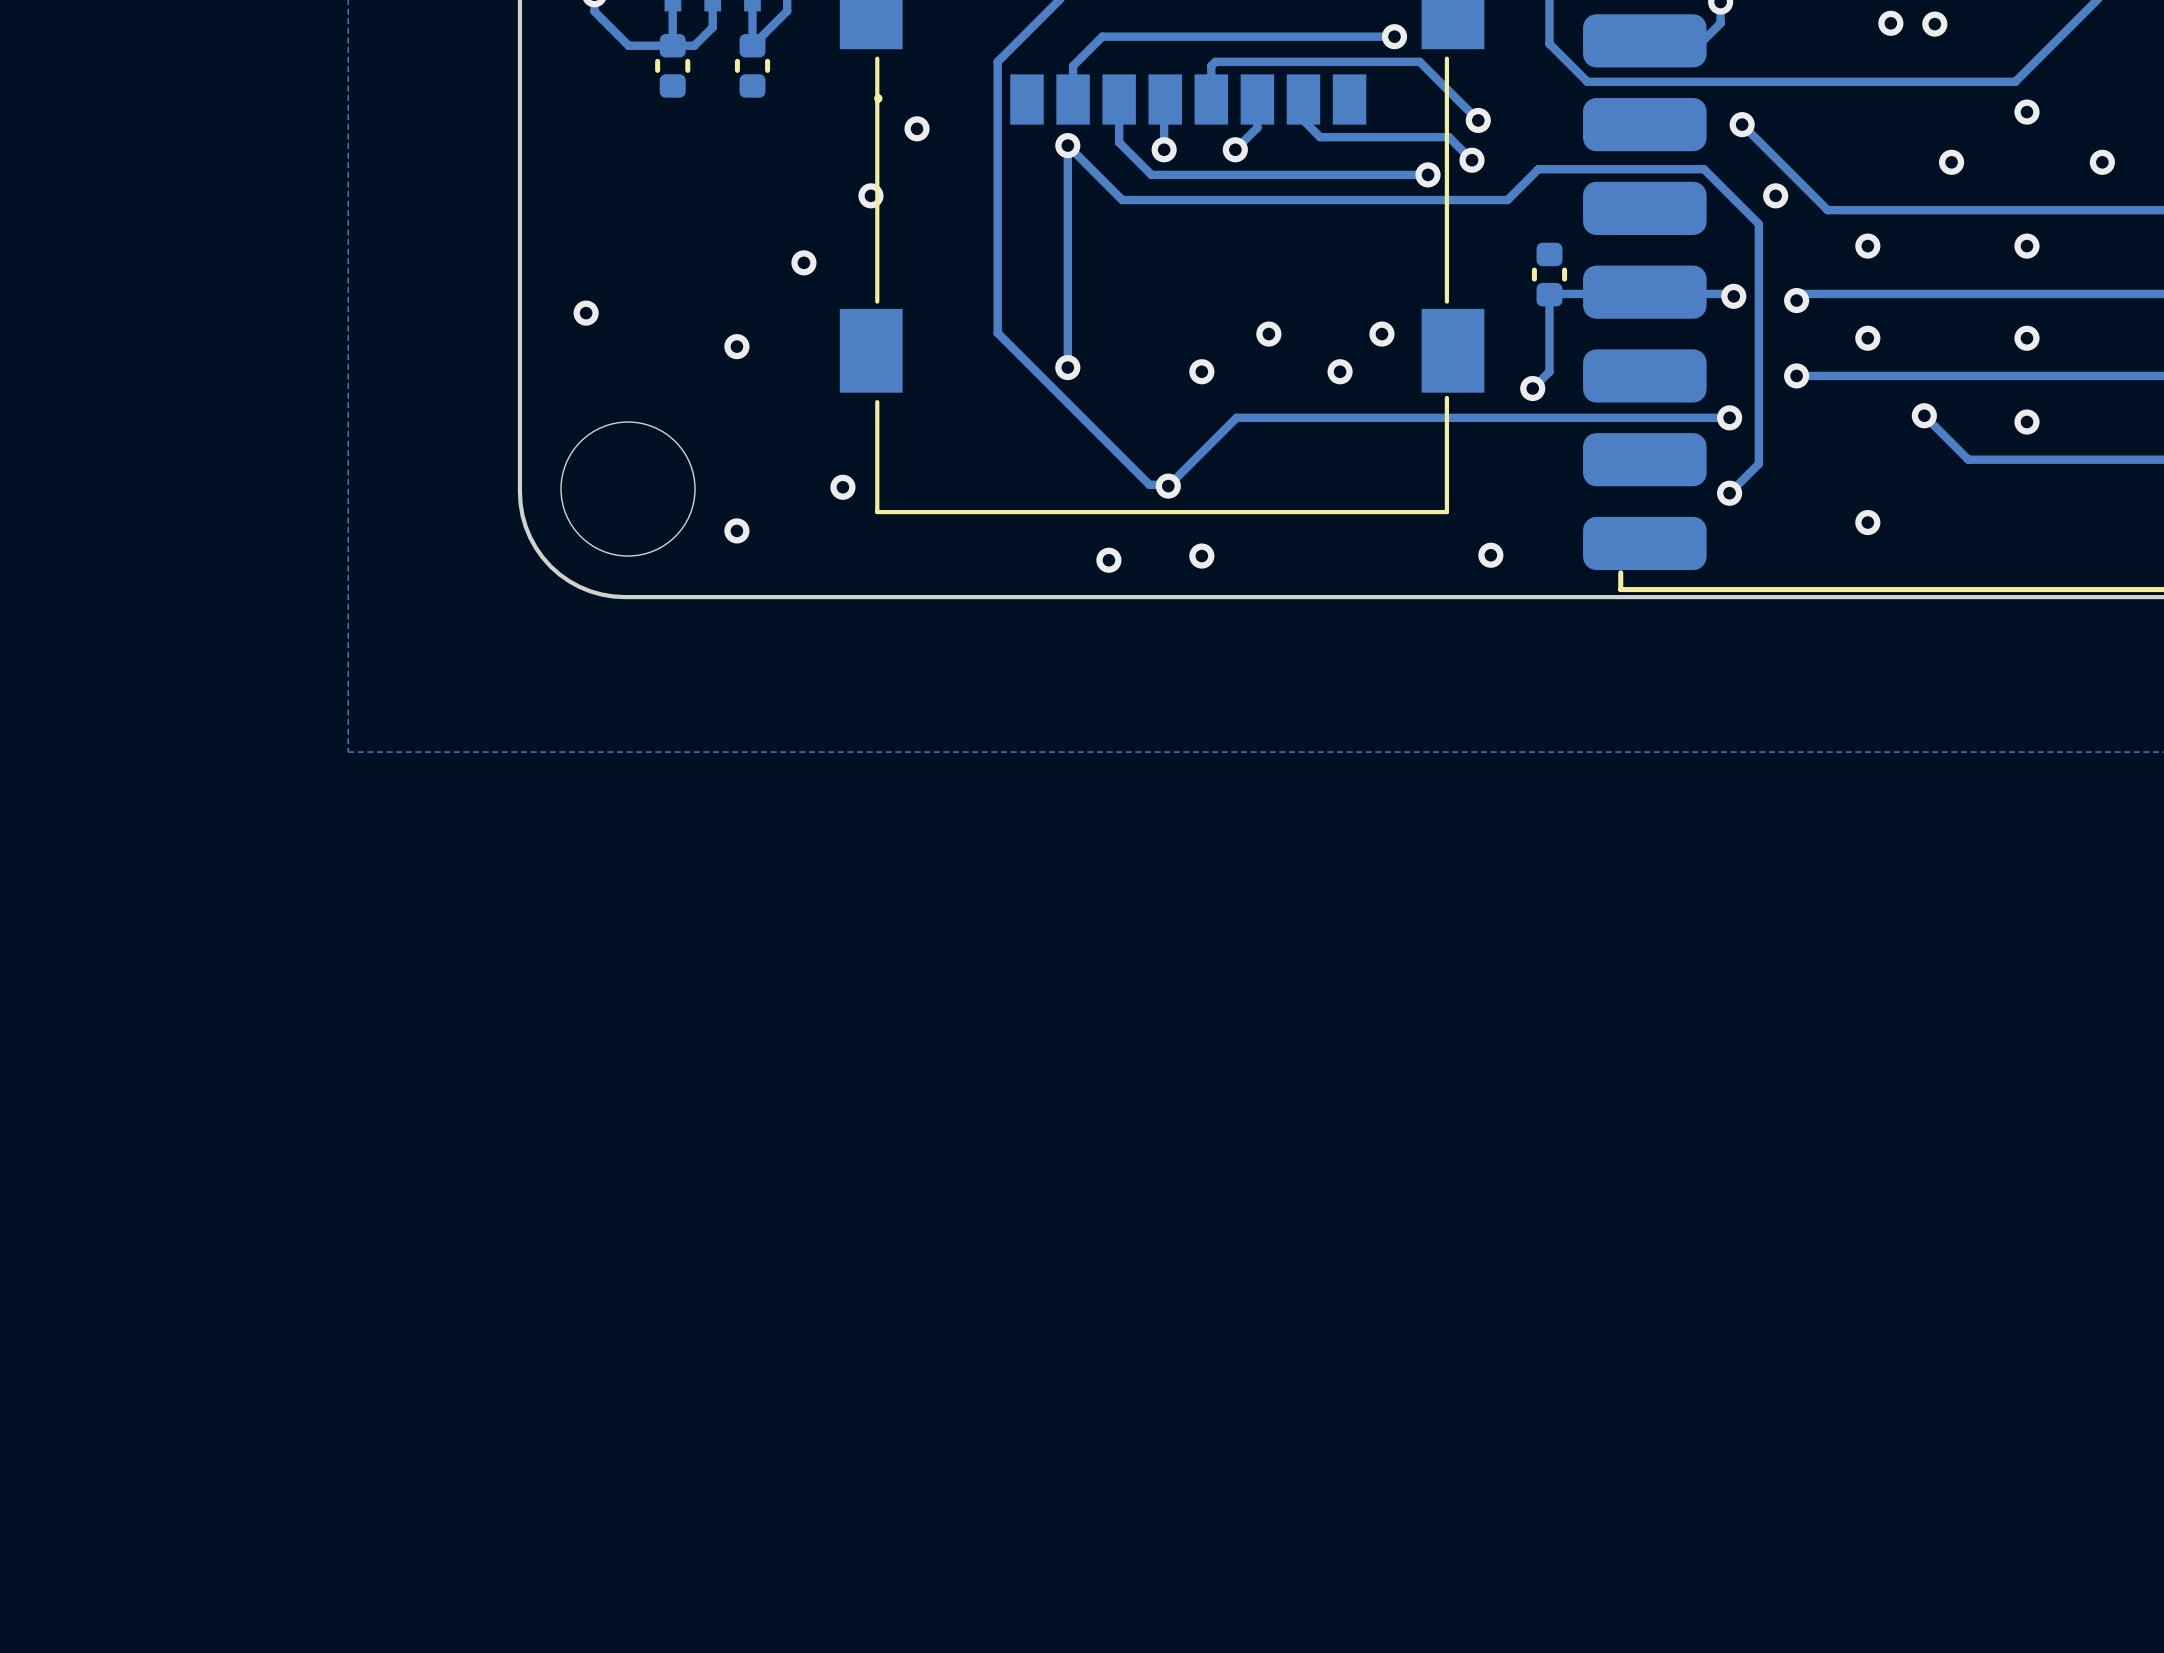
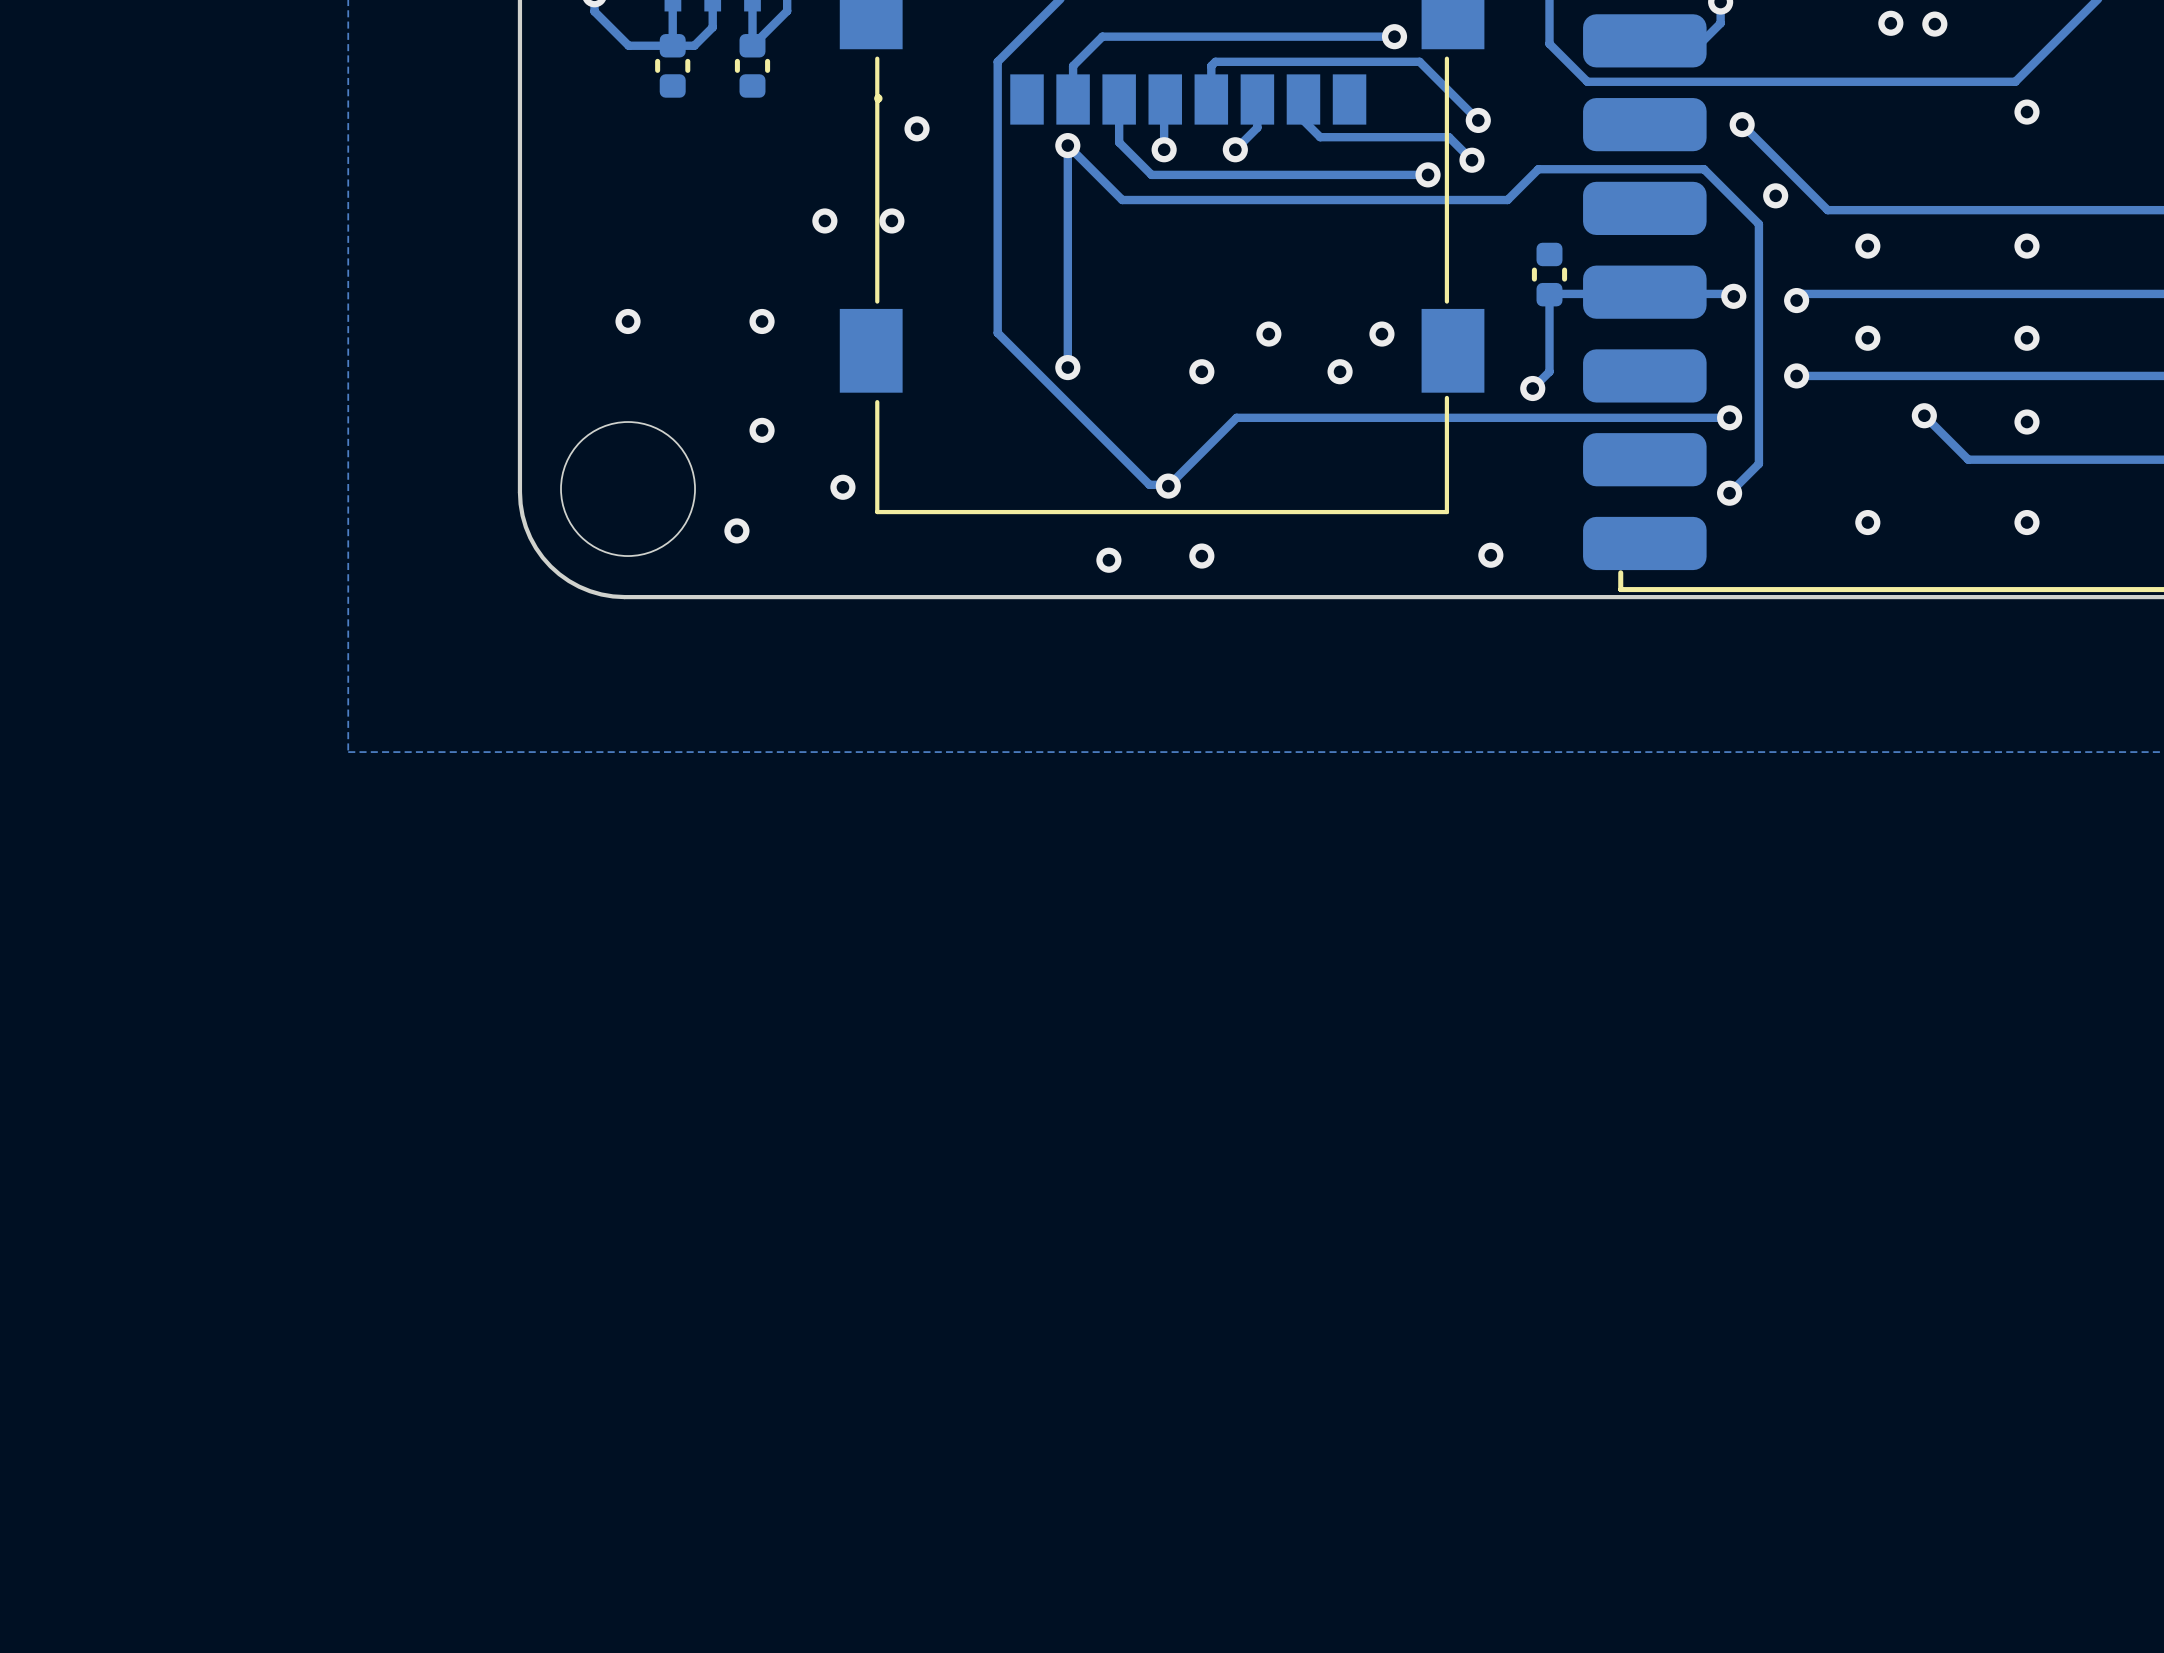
via: (1951, 162) -> none
via: (2102, 162) -> none
via position: (870, 195) -> (891, 220)
via: none -> (824, 220)
via: (803, 262) -> none
via position: (586, 313) -> (628, 321)
via position: (736, 346) -> (762, 321)
via: none -> (762, 430)
via: none -> (2026, 522)

